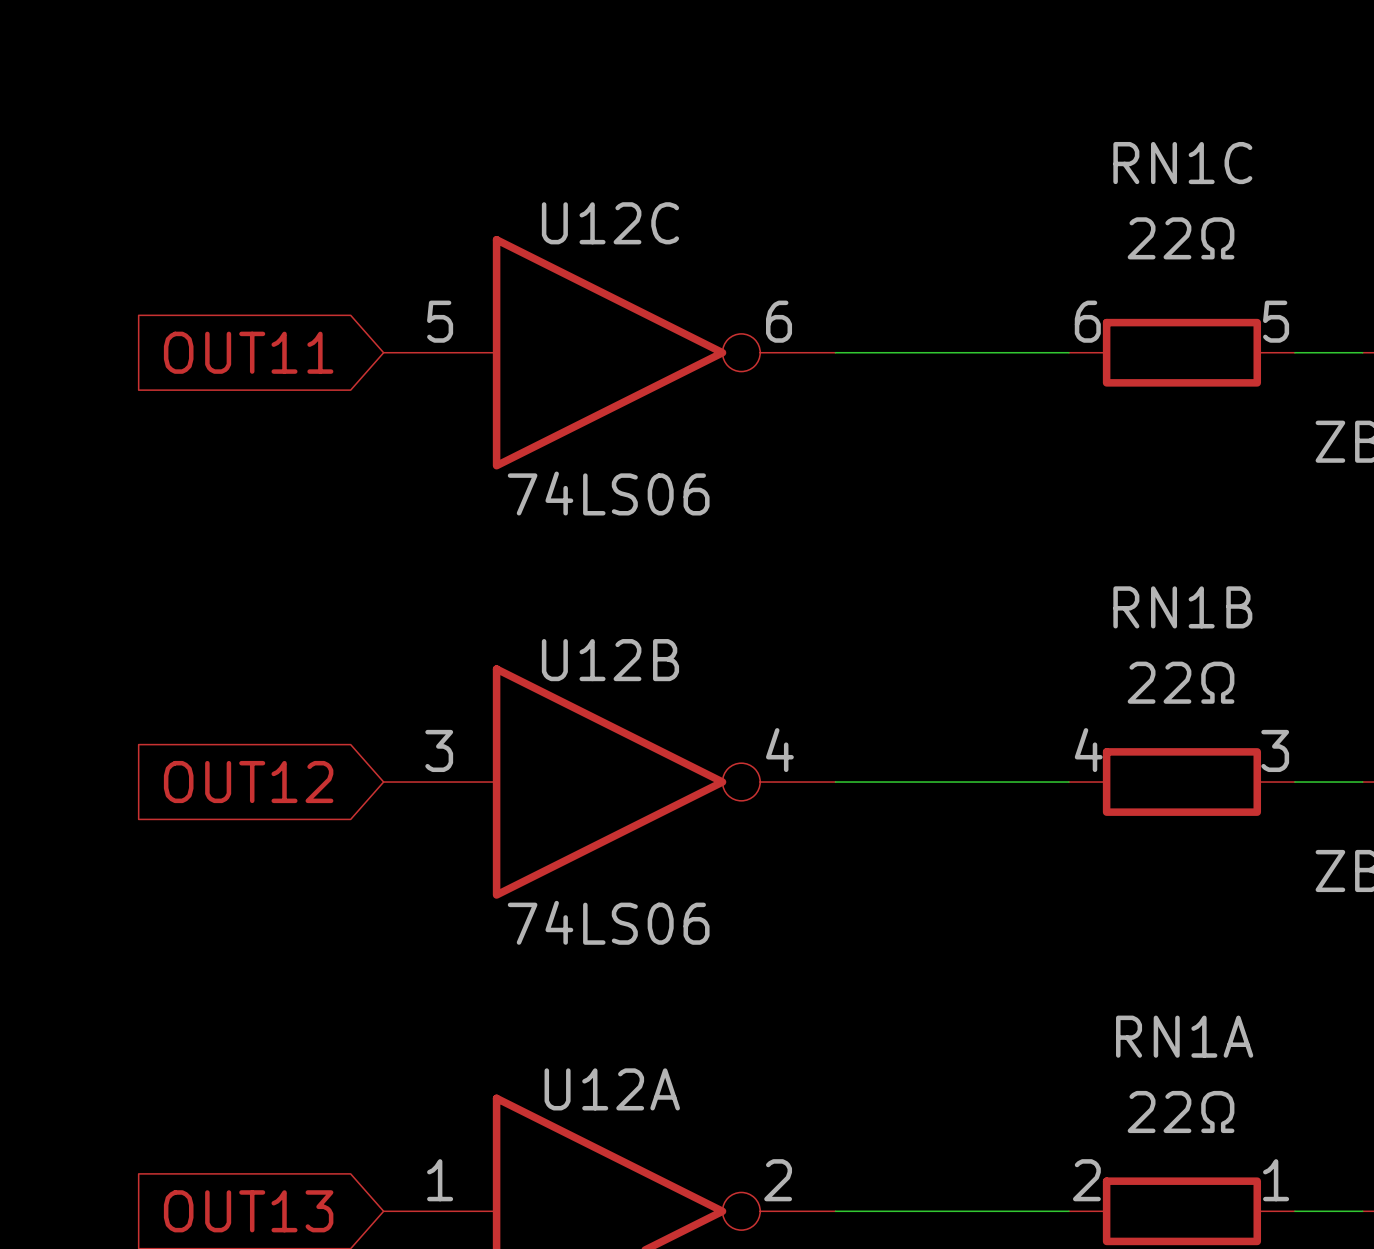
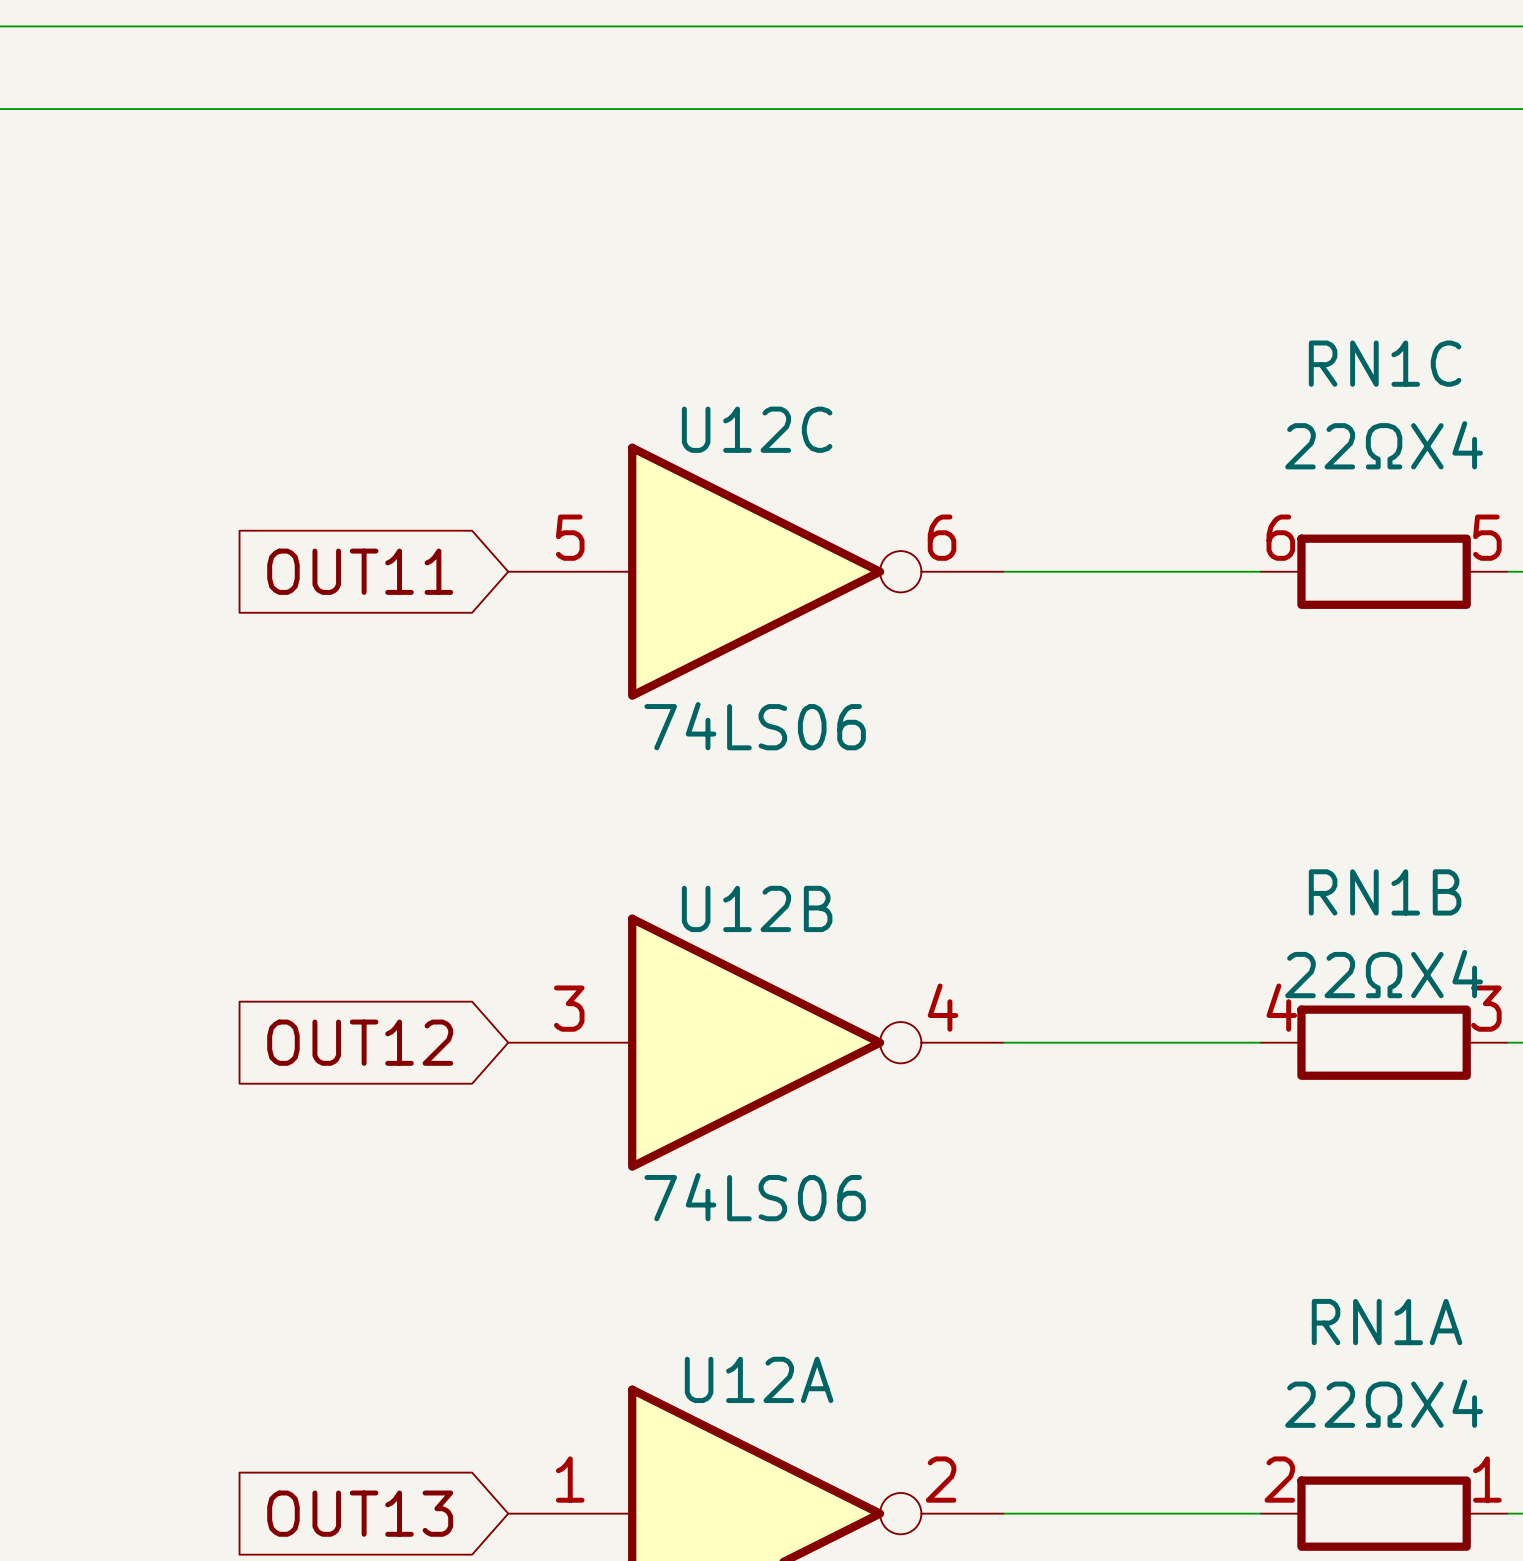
RN1C value: 22Ω (1181, 238) -> 22ΩX4 (1384, 445)
RN1B name position: RN1B (1182, 607) -> RN1B (1385, 892)
RN1B value: 22Ω (1181, 682) -> 22ΩX4 (1384, 974)
RN1A value: 22Ω (1181, 1111) -> 22ΩX4 (1384, 1403)

